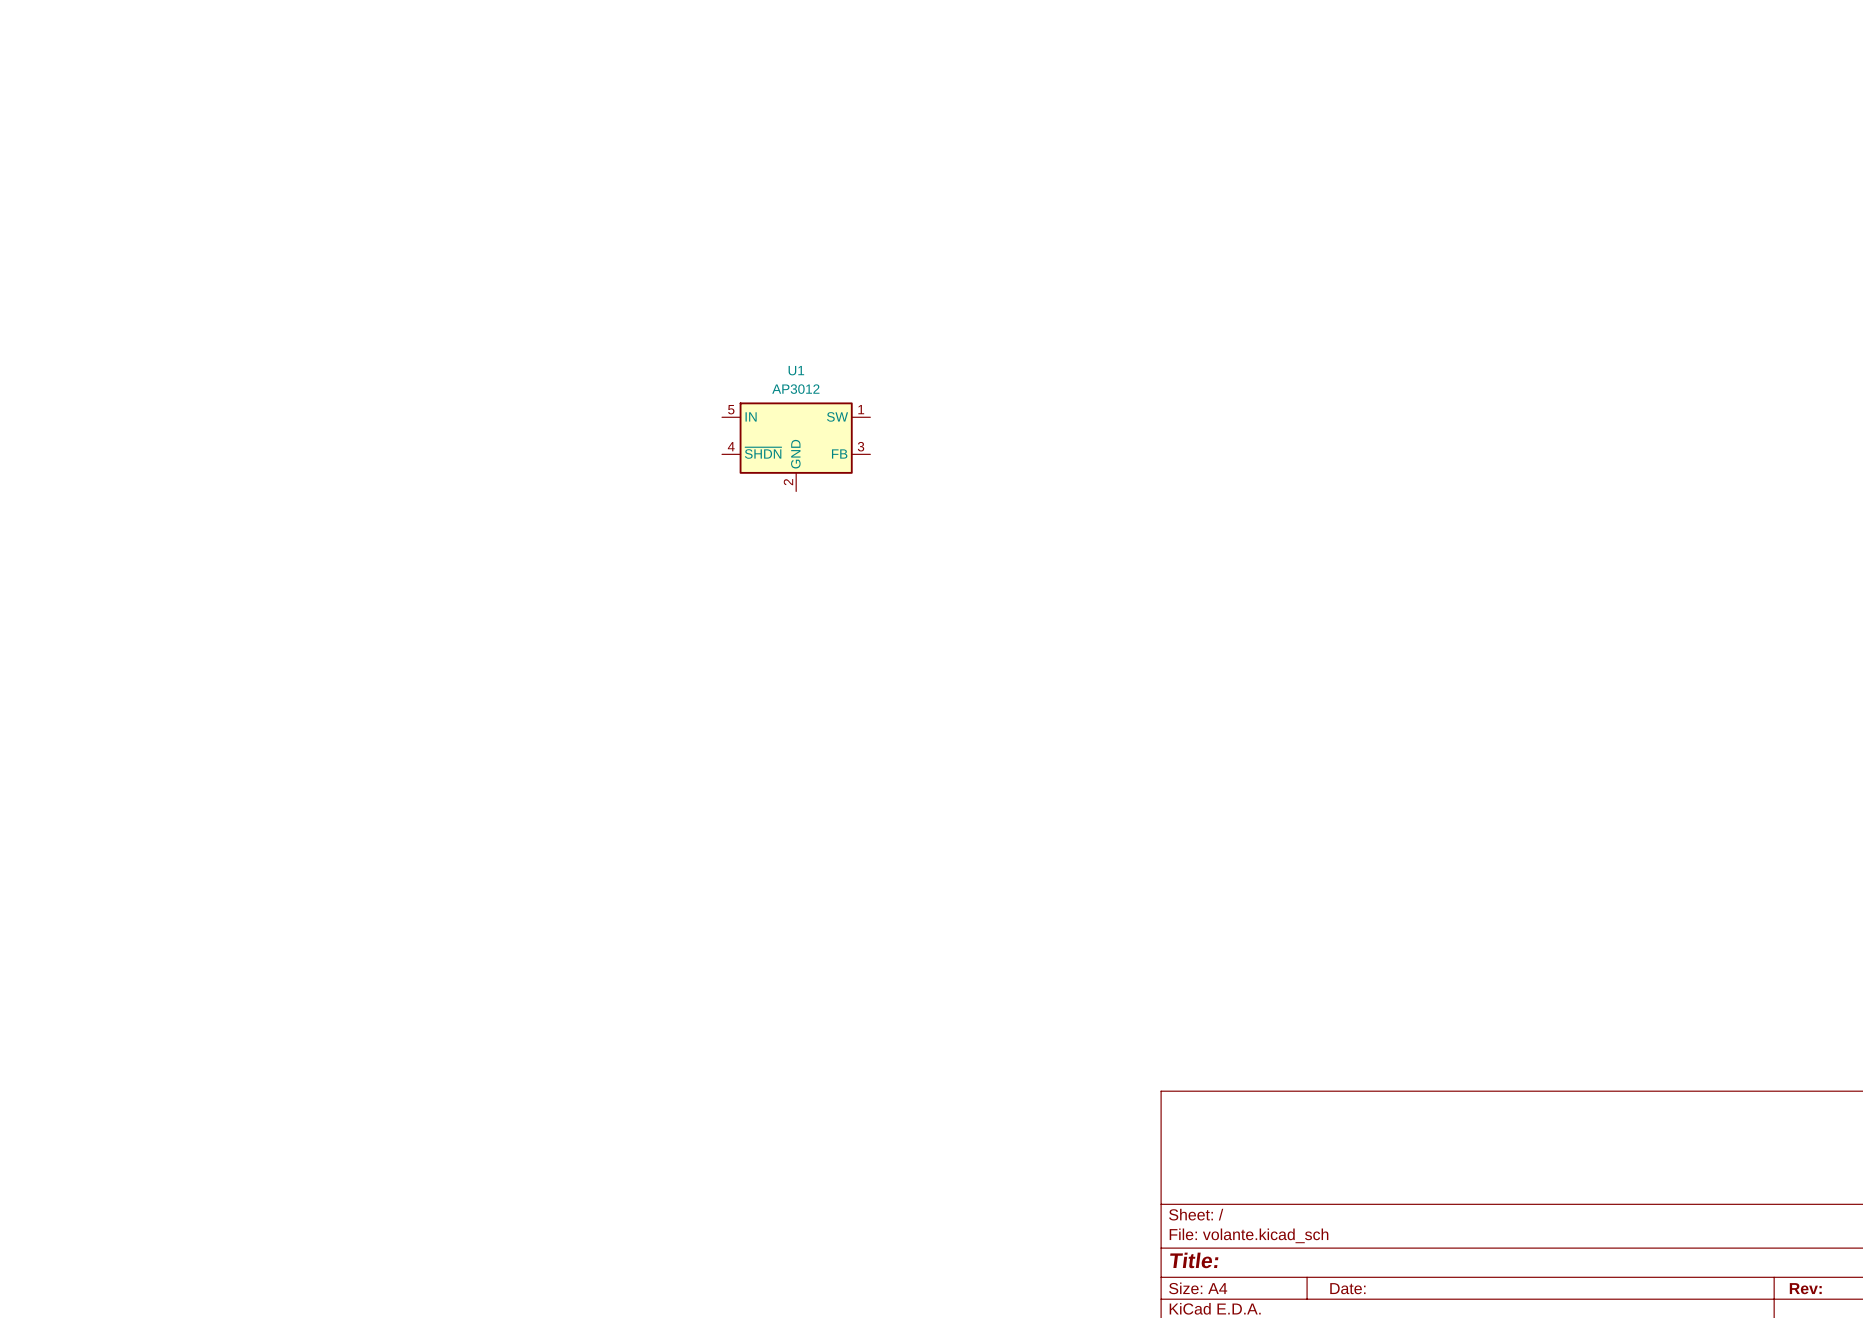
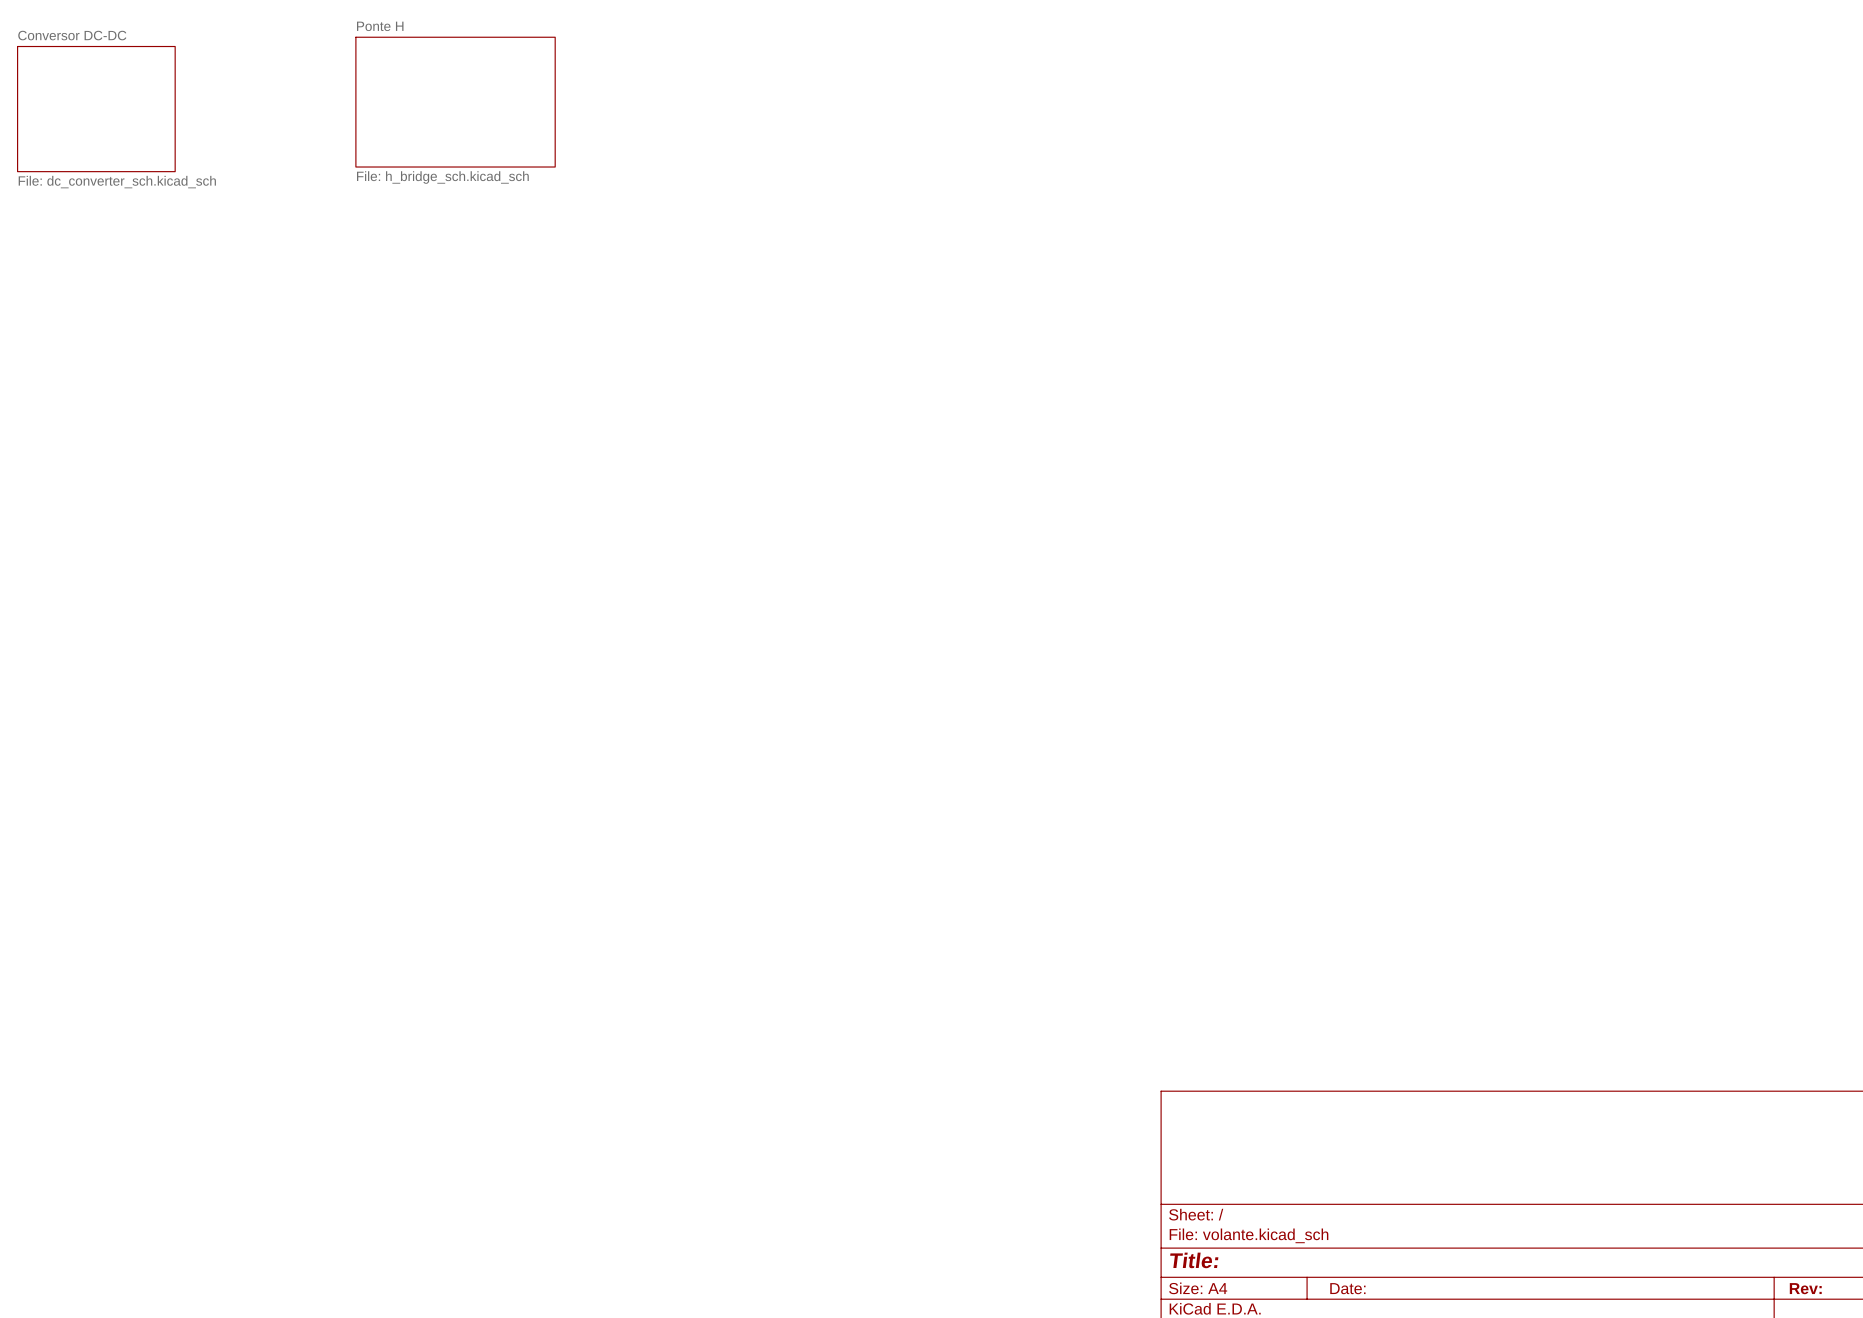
sheet Ponte H: none -> File: h_bridge_sch.kicad_sch (455, 102)
sheet Conversor DC-DC: none -> File: dc_converter_sch.kicad_sch (96, 109)
U1: AP3012 (796, 446) -> none

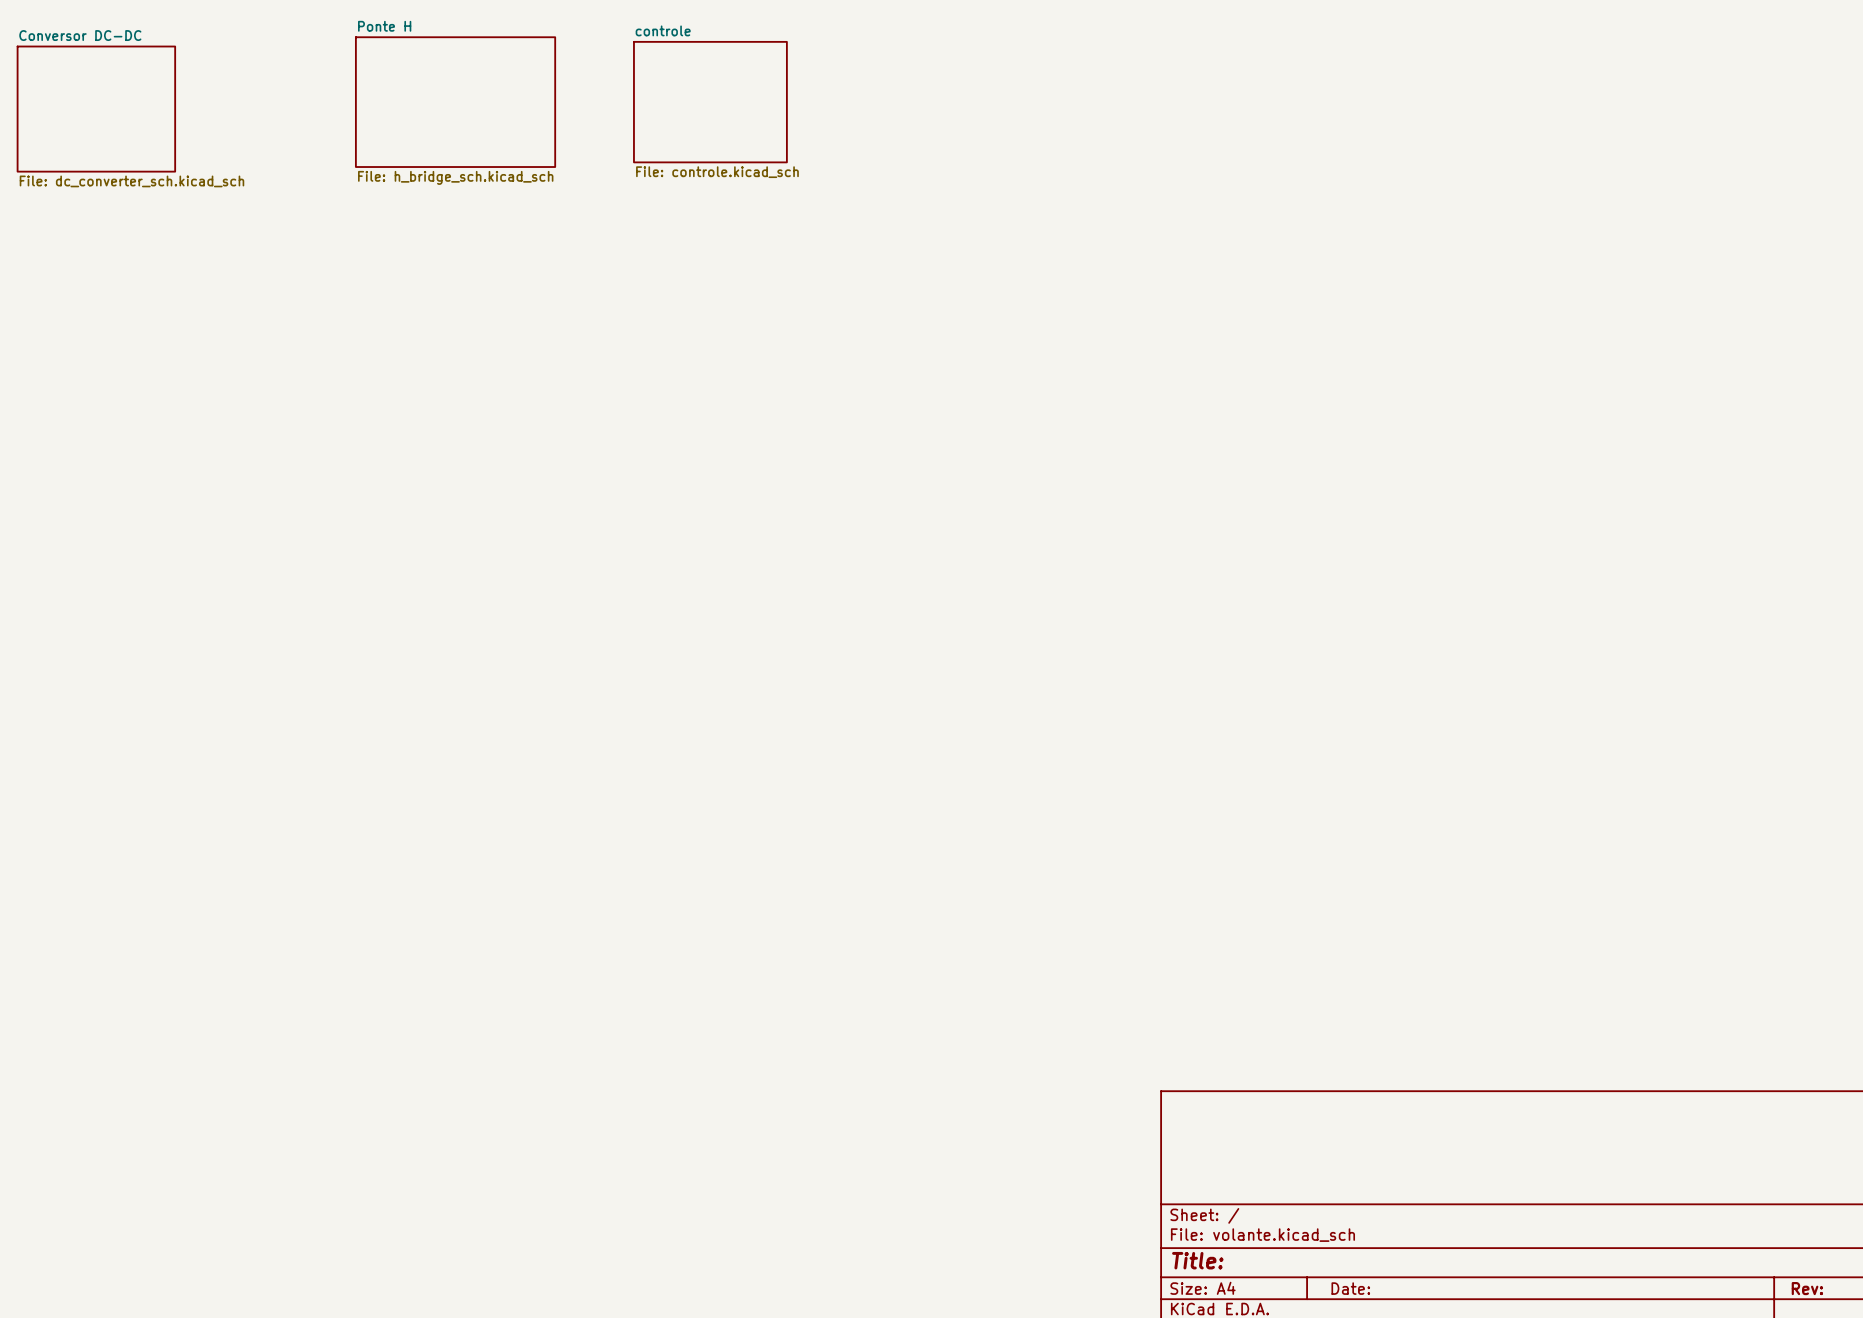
sheet controle: none -> File: controle.kicad_sch (710, 102)

